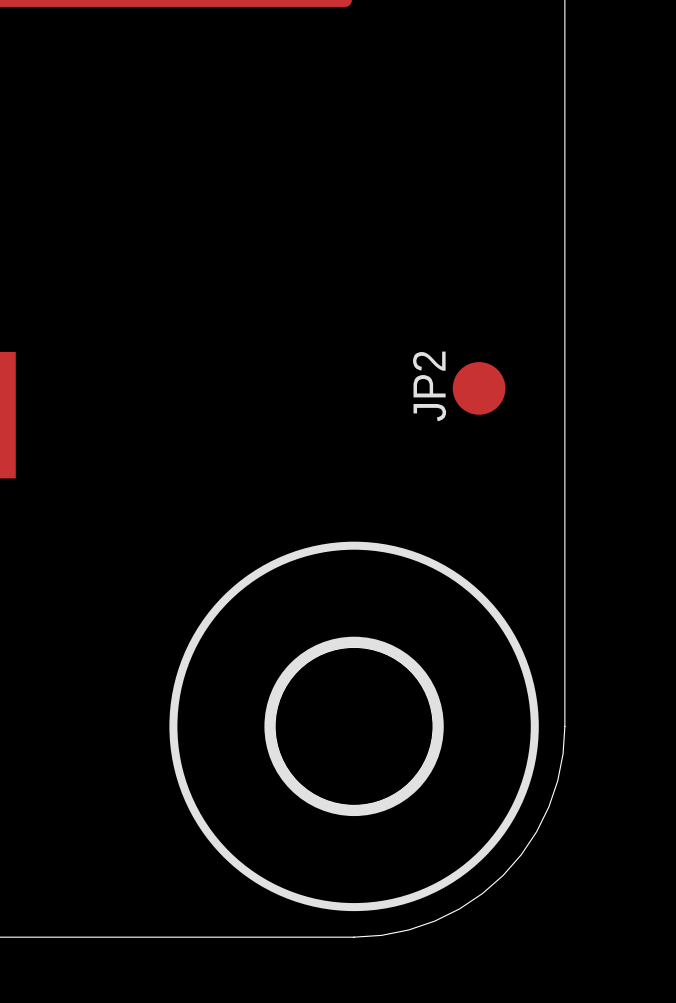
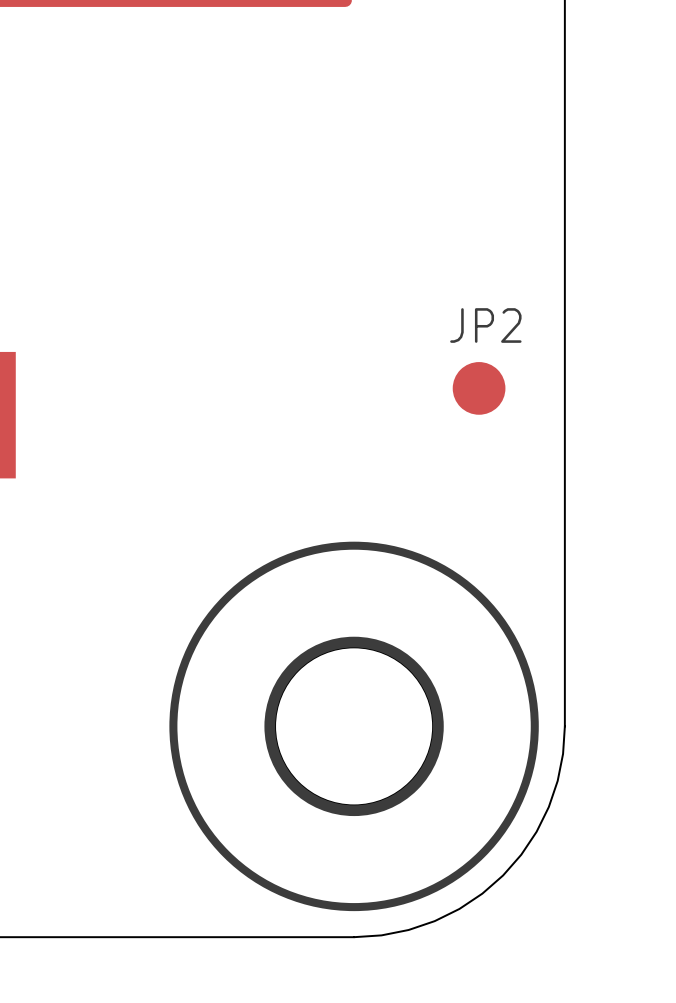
JP2 name rotation: 0° (429, 386) -> 90° clockwise (485, 325)

